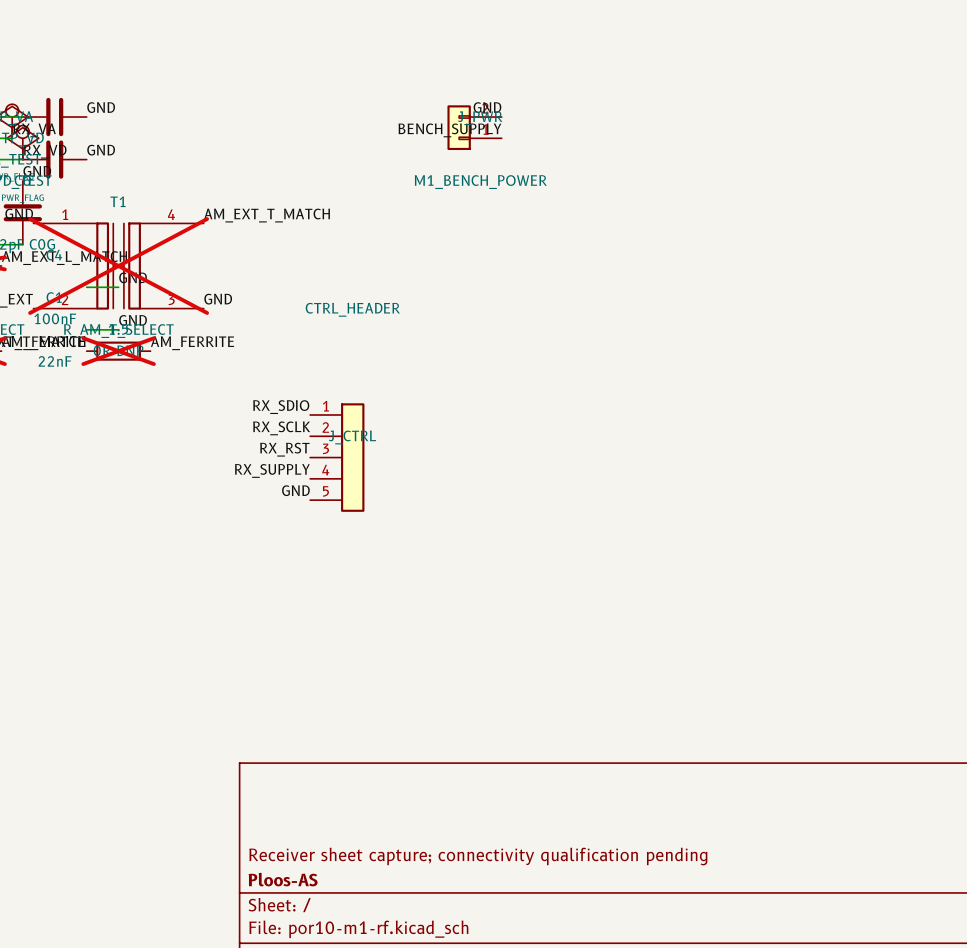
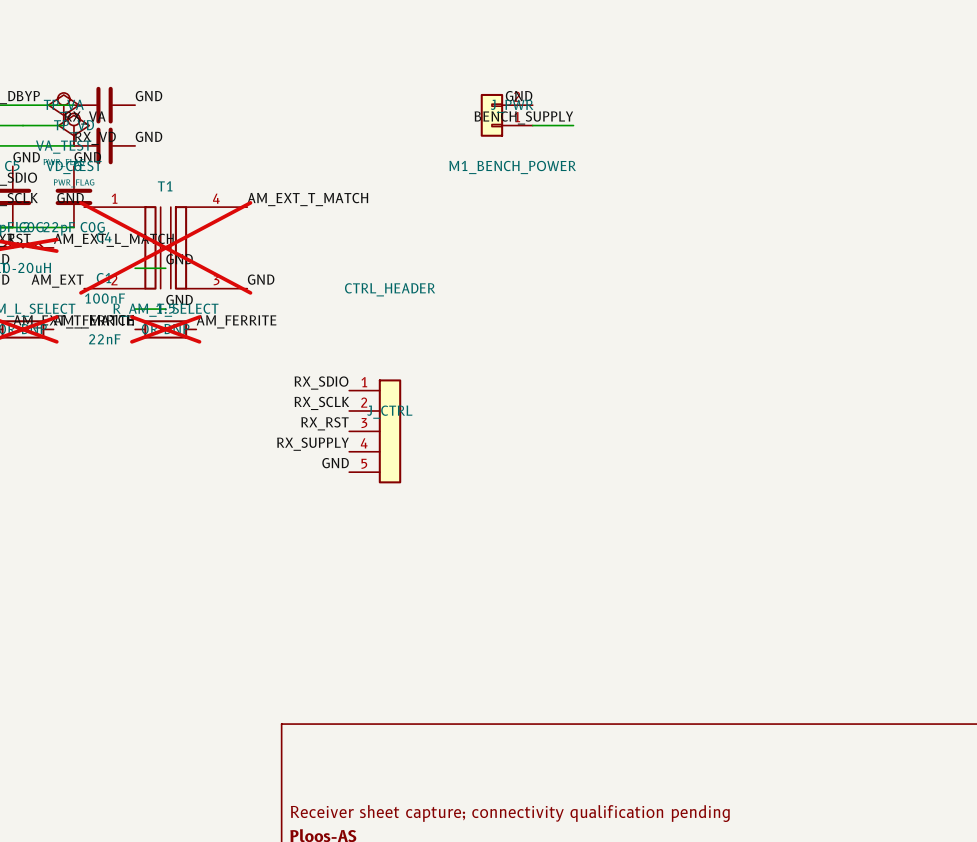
label position: BENCH_SUPPLY (449, 130) -> BENCH_SUPPLY (523, 117)
wire: none -> (532, 125) (573, 125)

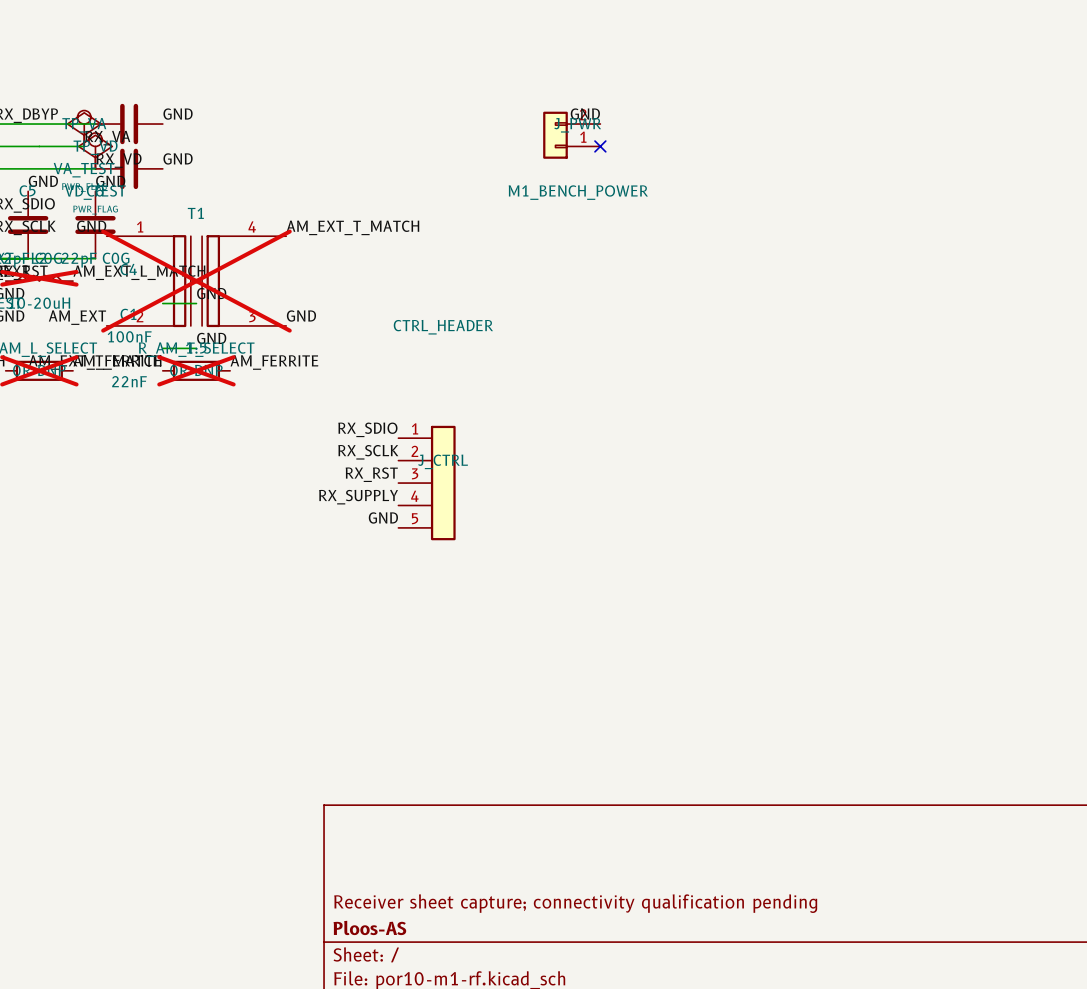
label: BENCH_SUPPLY (523, 117) -> none
wire: (532, 125) (573, 125) -> none
no-connect mark: none -> (600, 146)

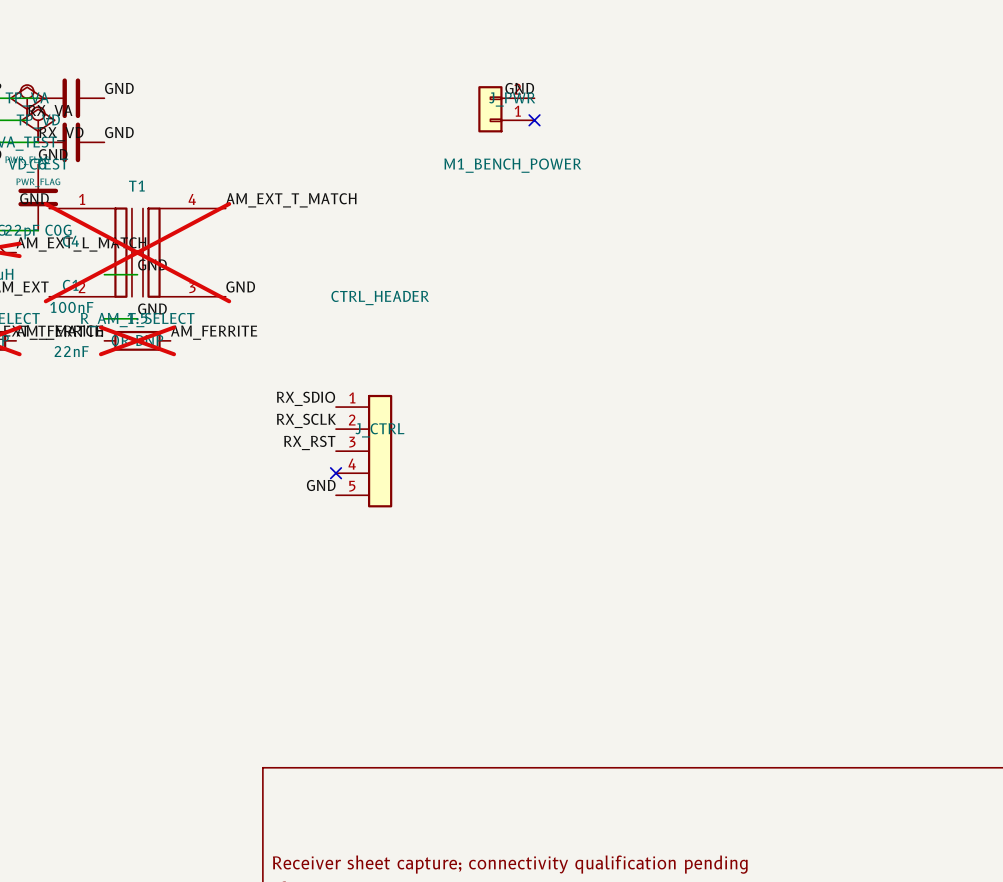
label: RX_SUPPLY (358, 497) -> none
no-connect mark: none -> (336, 473)

